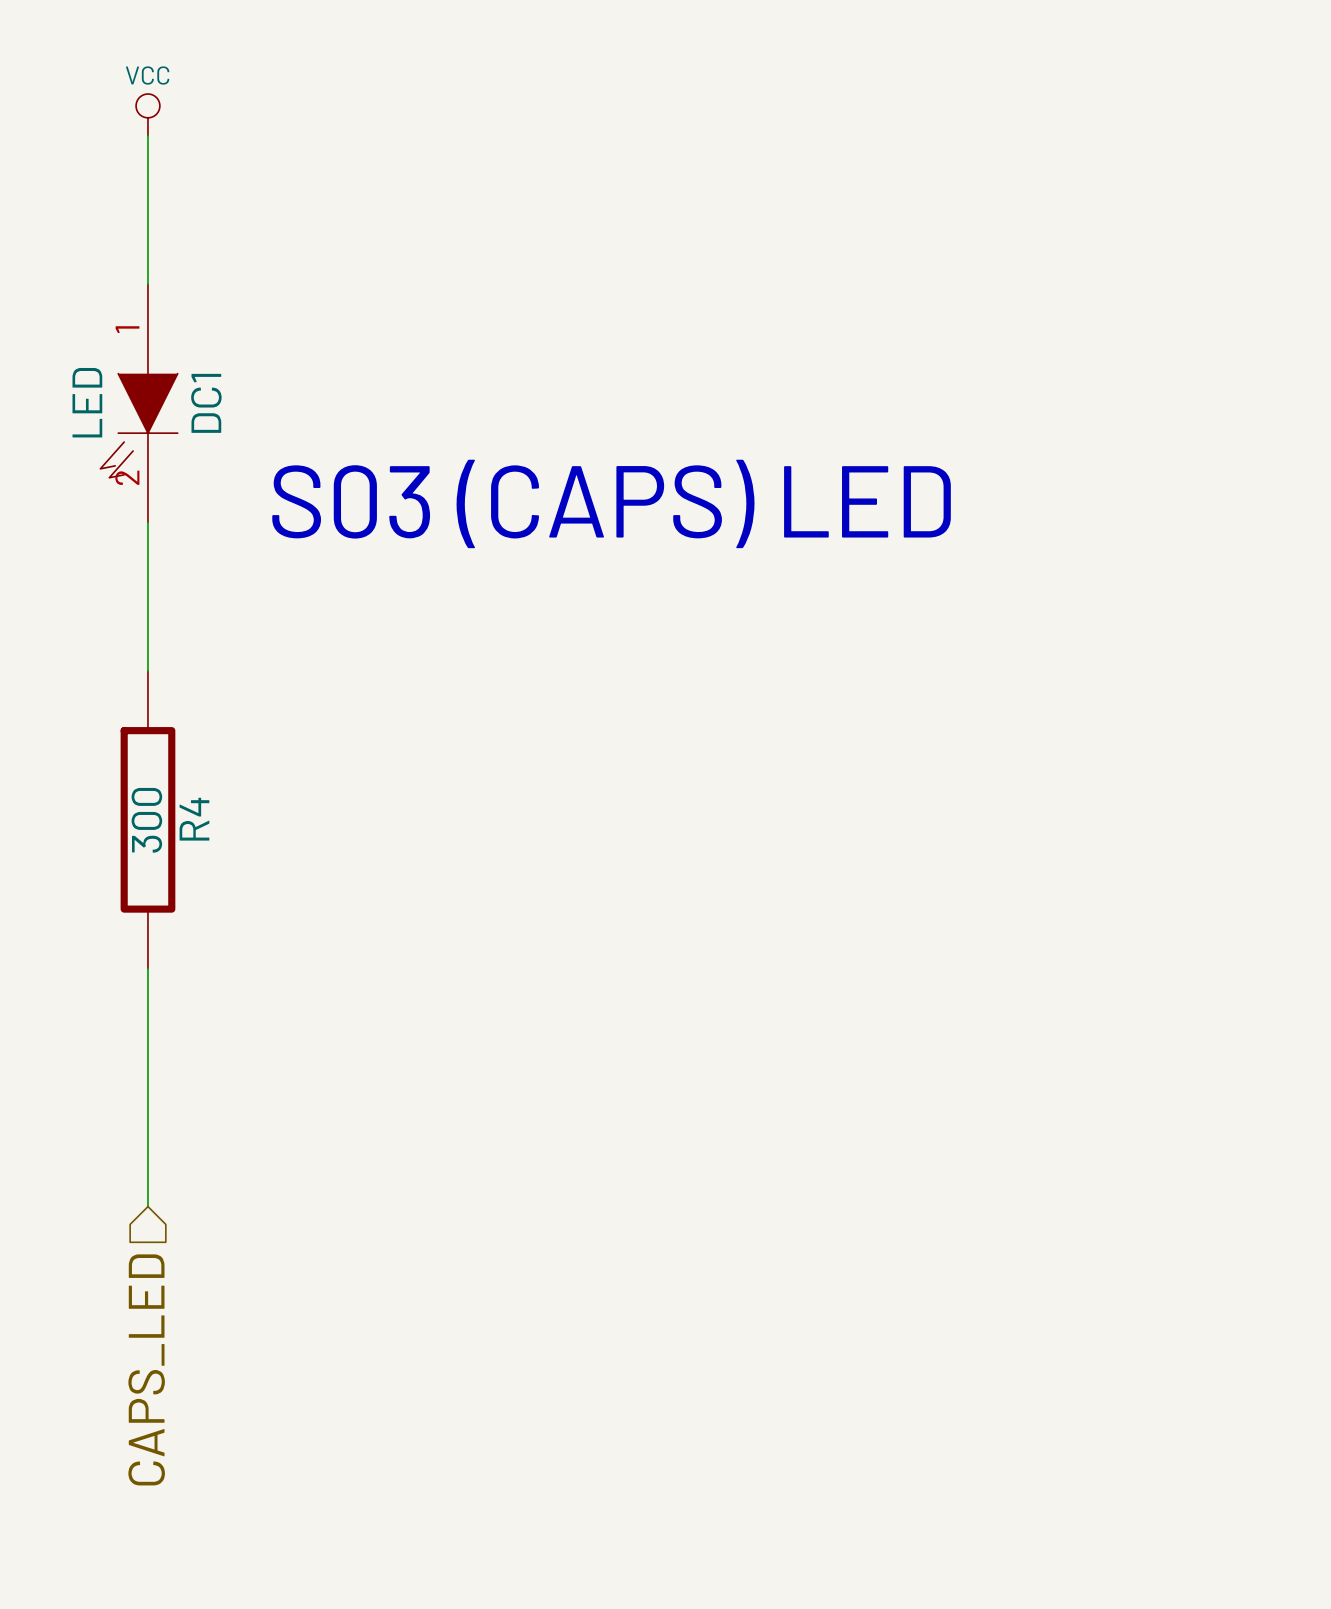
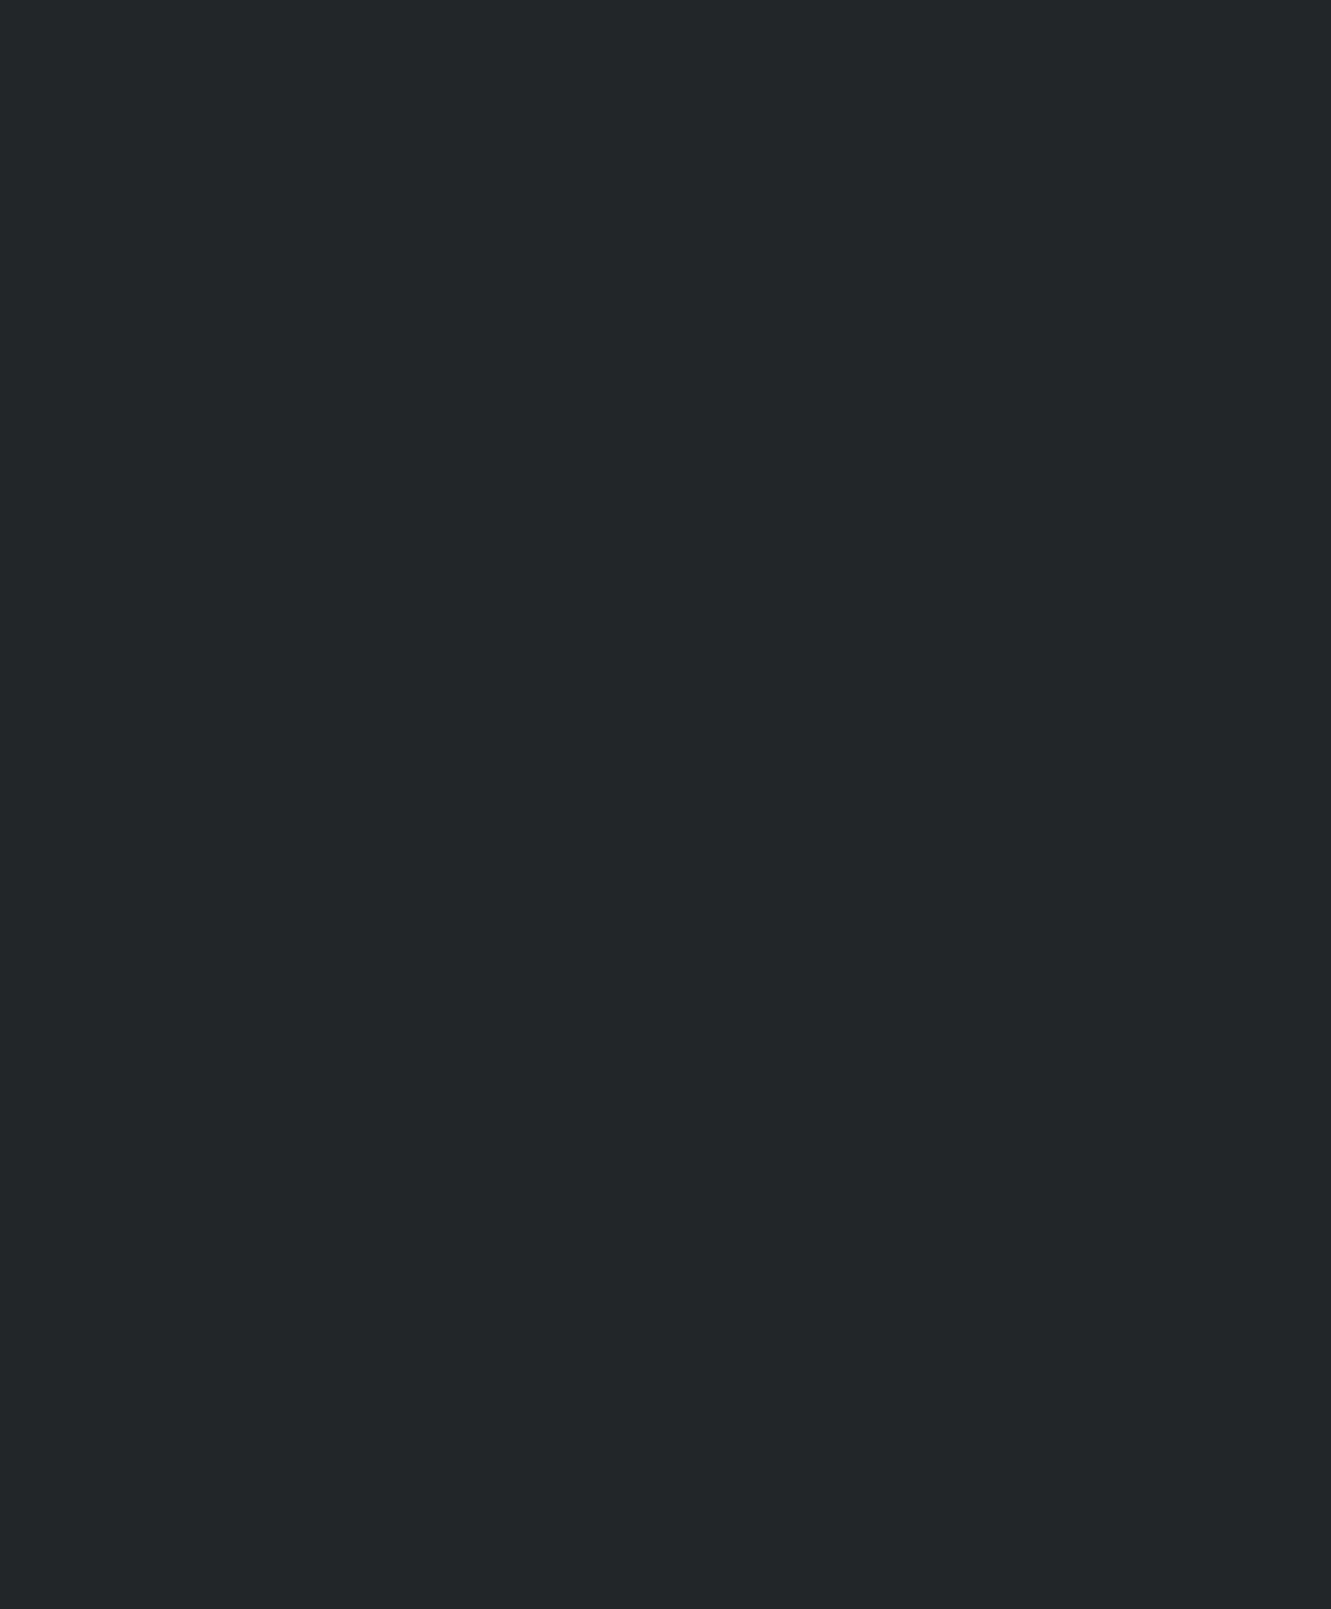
power symbol: VCC (147, 114) -> none
wire: (147, 135) (147, 284) -> none
DC1: LED (139, 403) -> none
text: S03 (CAPS) LED (611, 503) -> none
wire: (147, 522) (147, 671) -> none
R4: 300 (147, 819) -> none
wire: (147, 968) (147, 1206) -> none
hierarchical label: CAPS_LED (146, 1369) -> none

